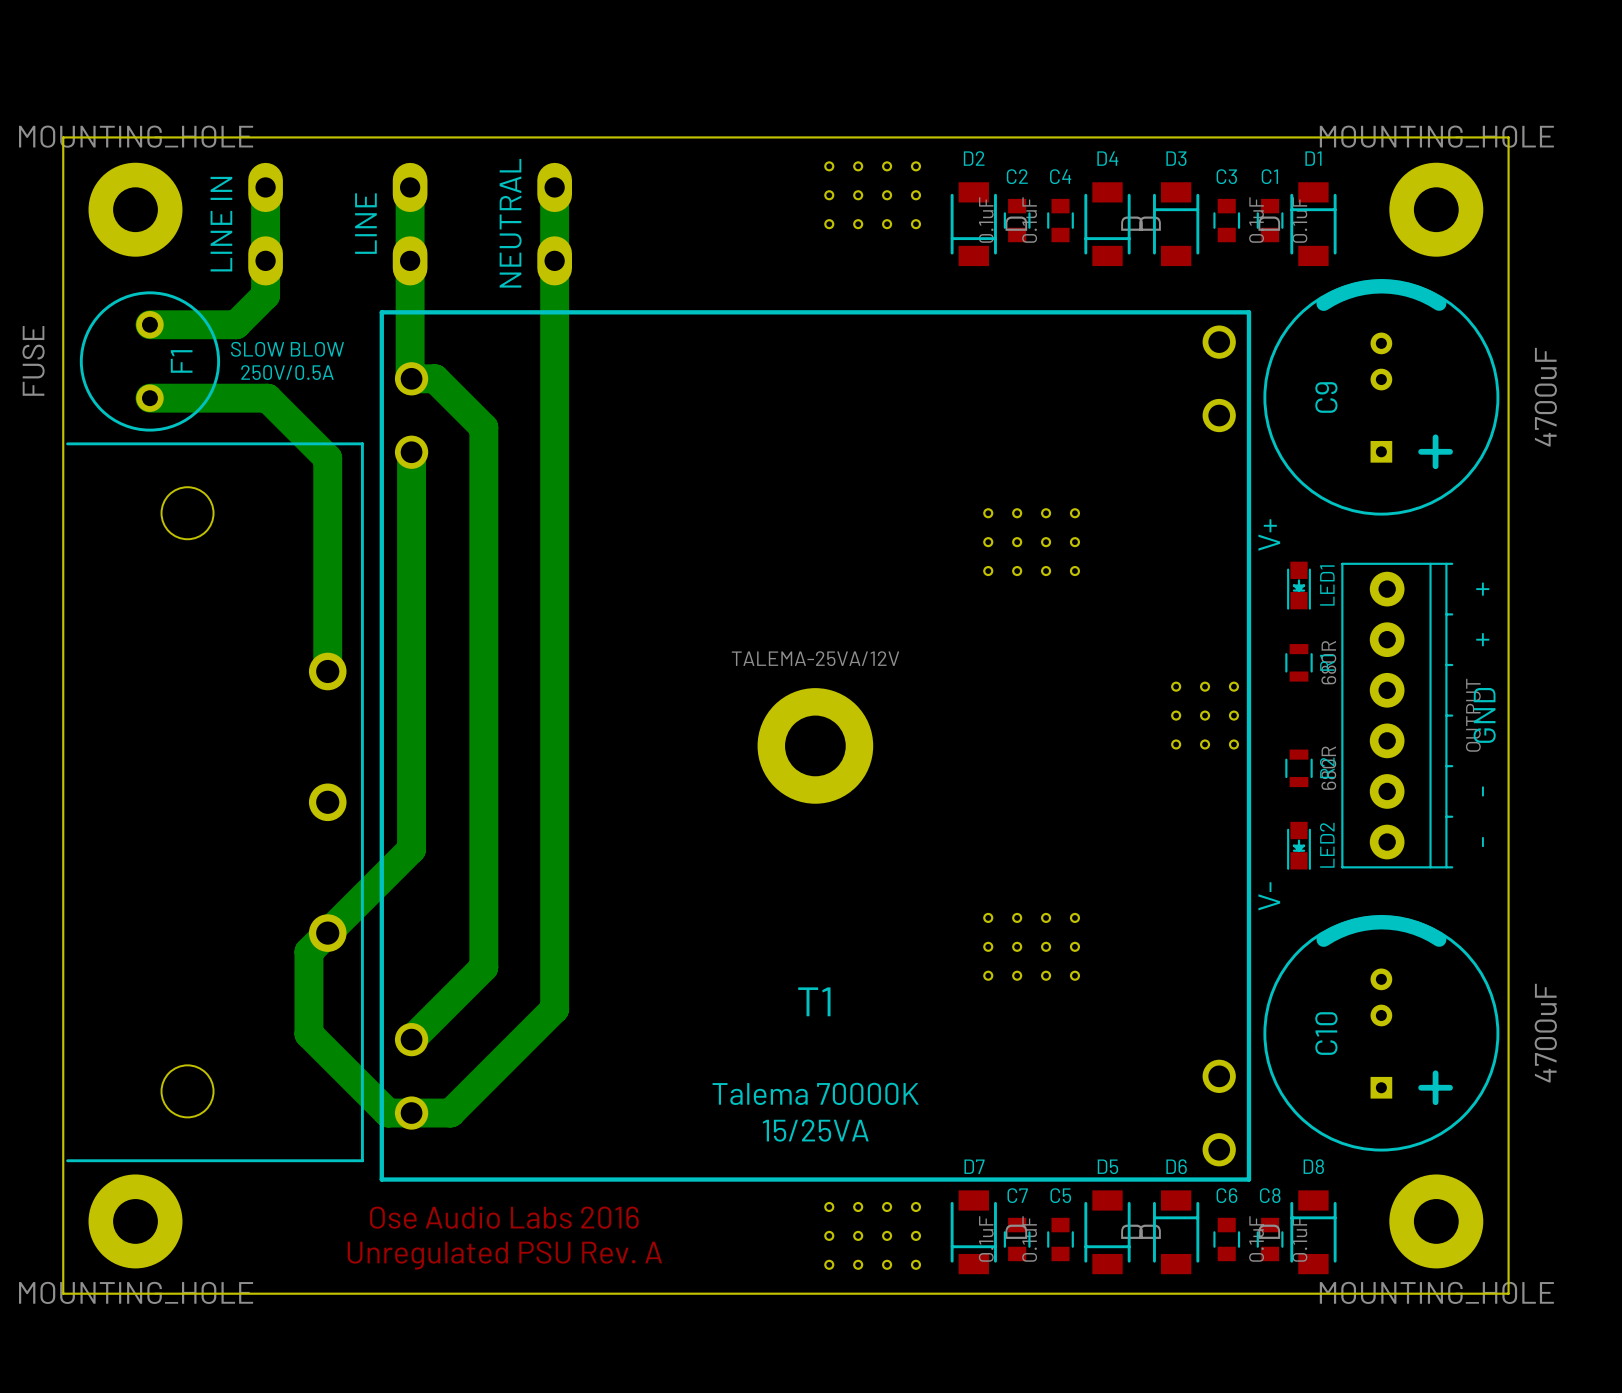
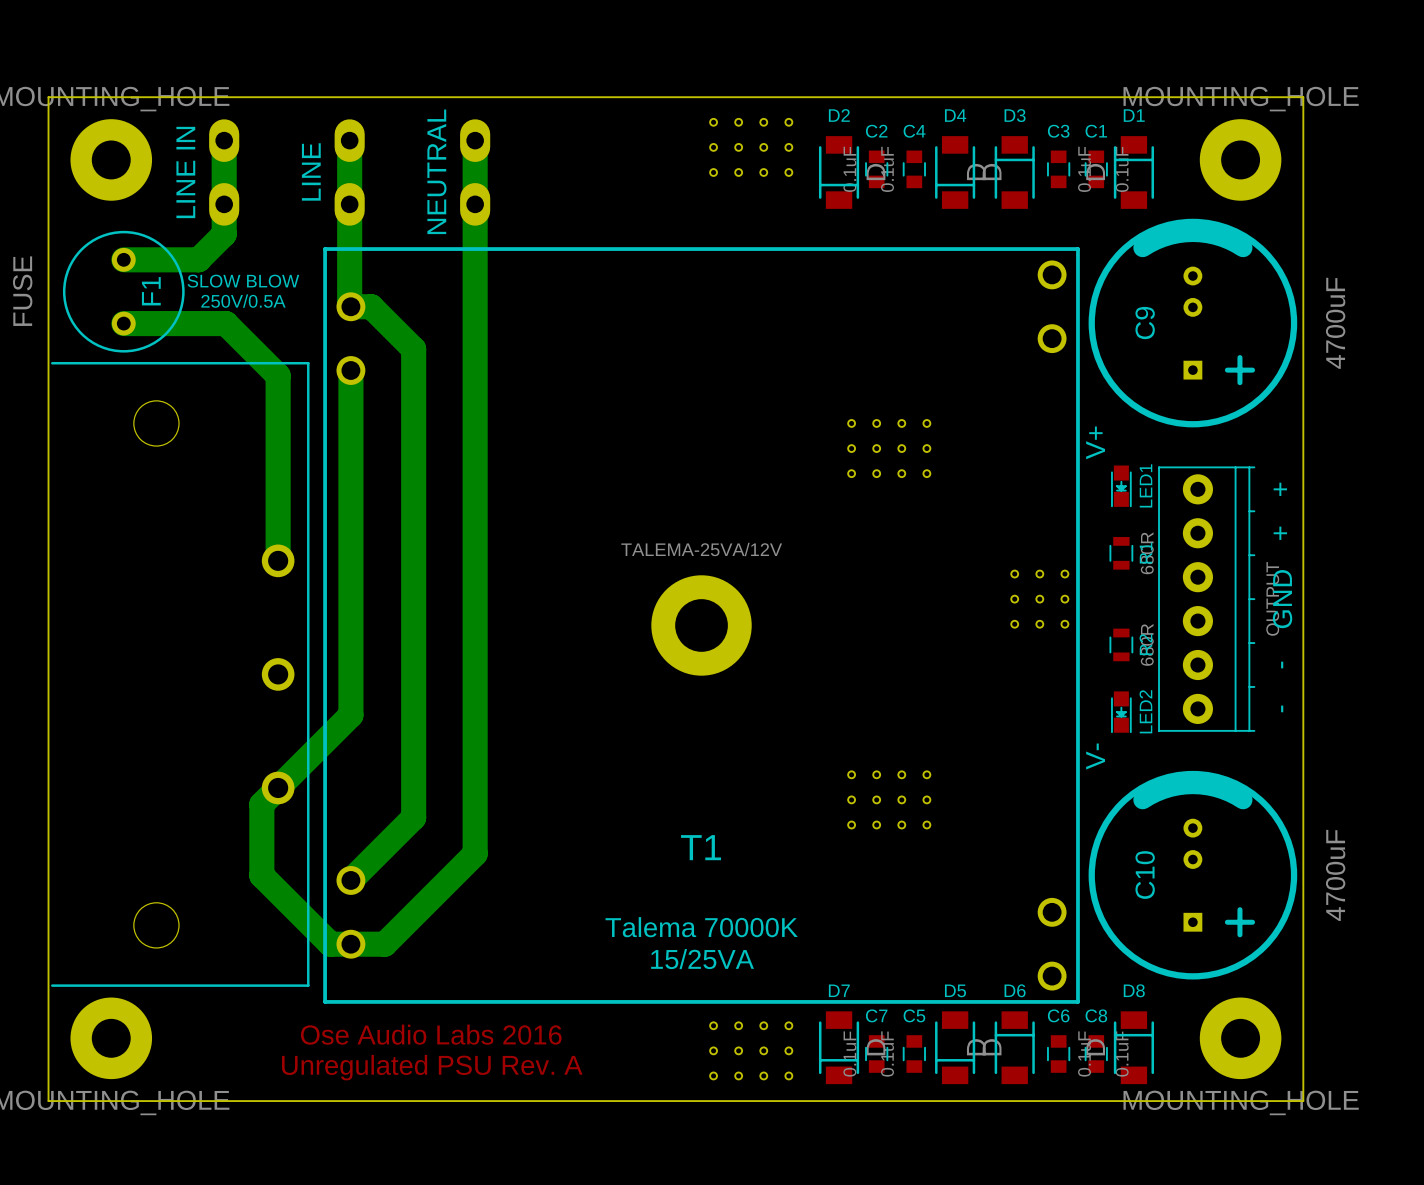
C9 footprint: [1263, 279, 1500, 516] -> [1088, 218, 1298, 428]
C10 footprint: [1263, 914, 1500, 1152] -> [1088, 770, 1298, 980]

